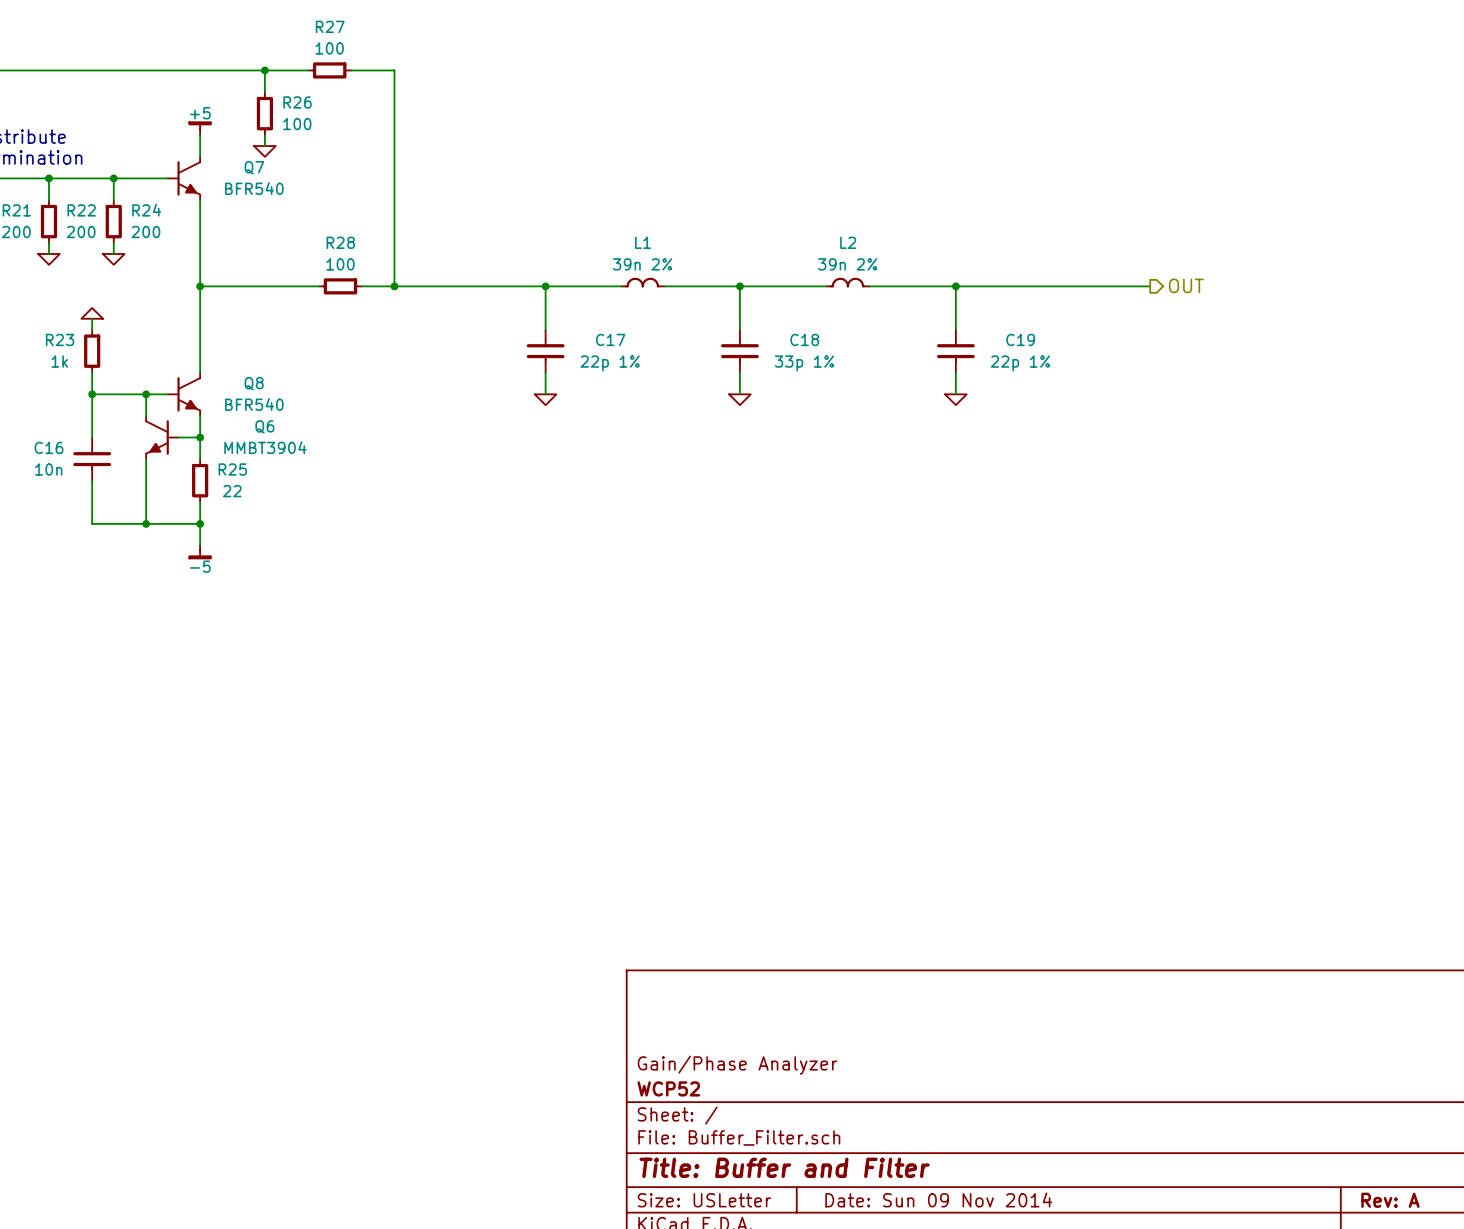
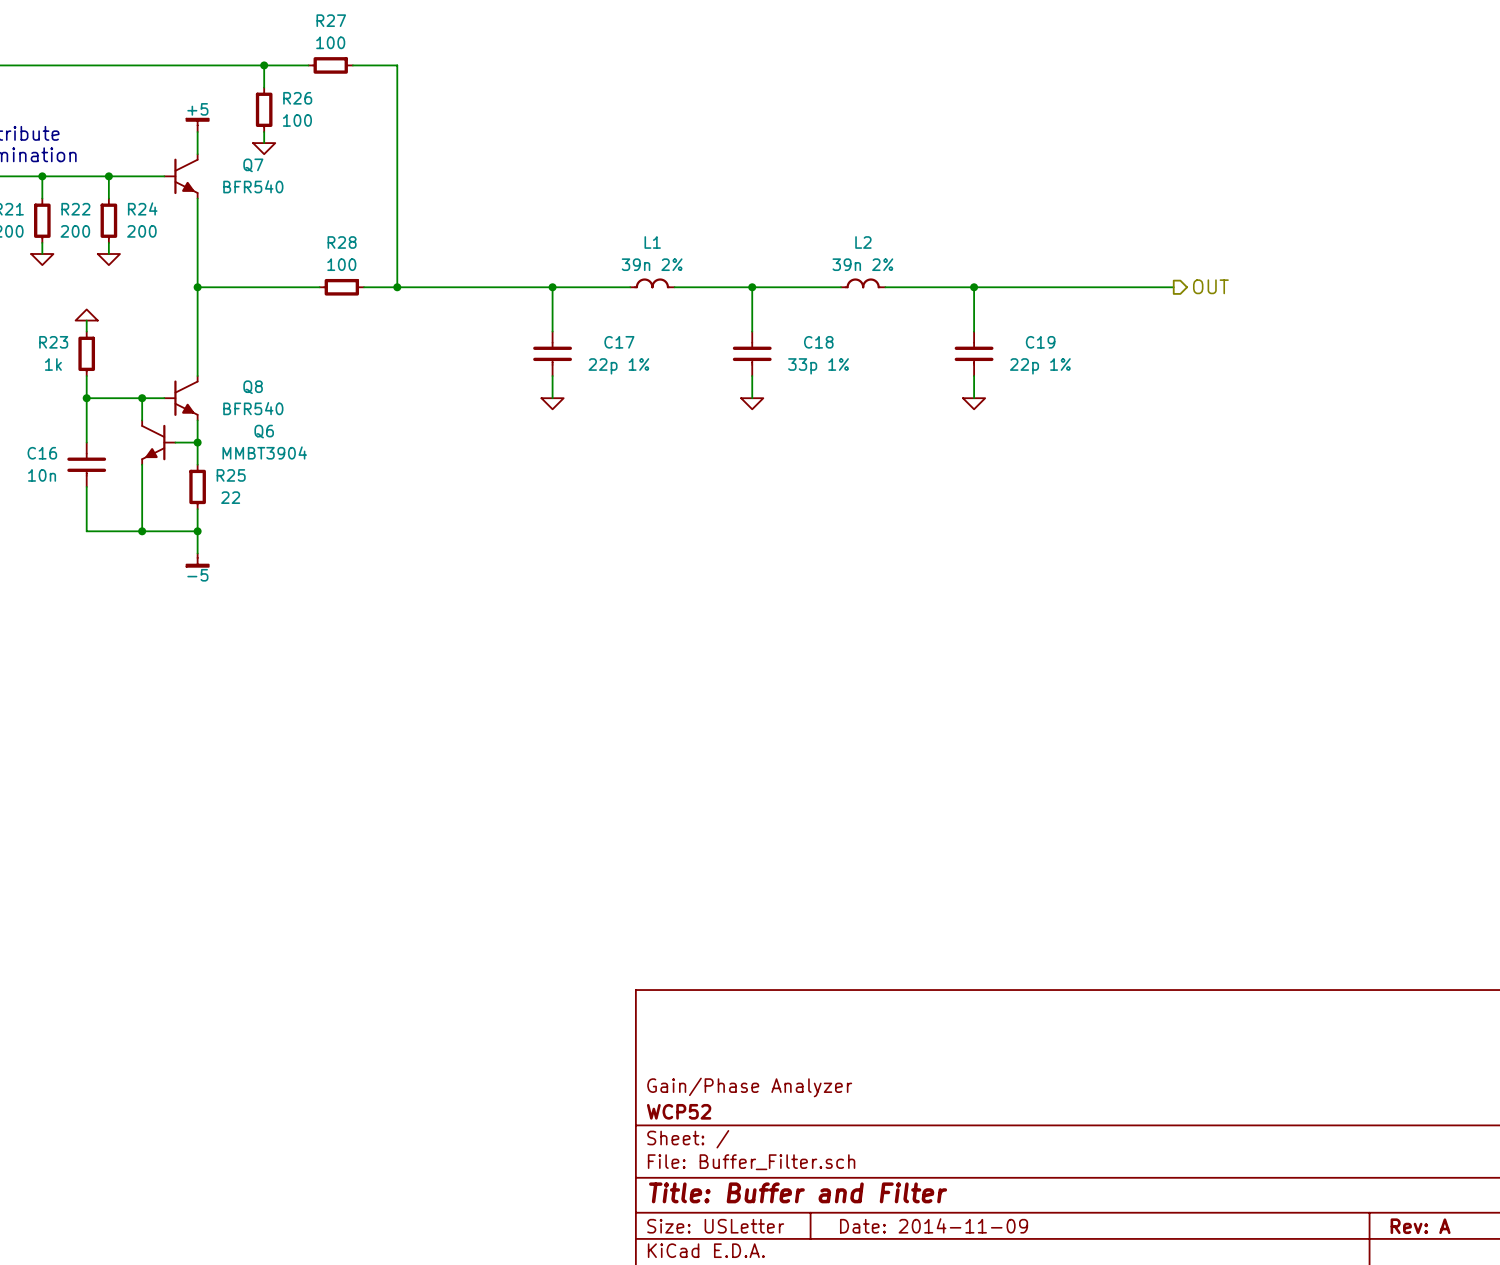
title block: Date: Sun 09 Nov 2014 (938, 1199) -> Date: 2014-11-09 (934, 1225)

